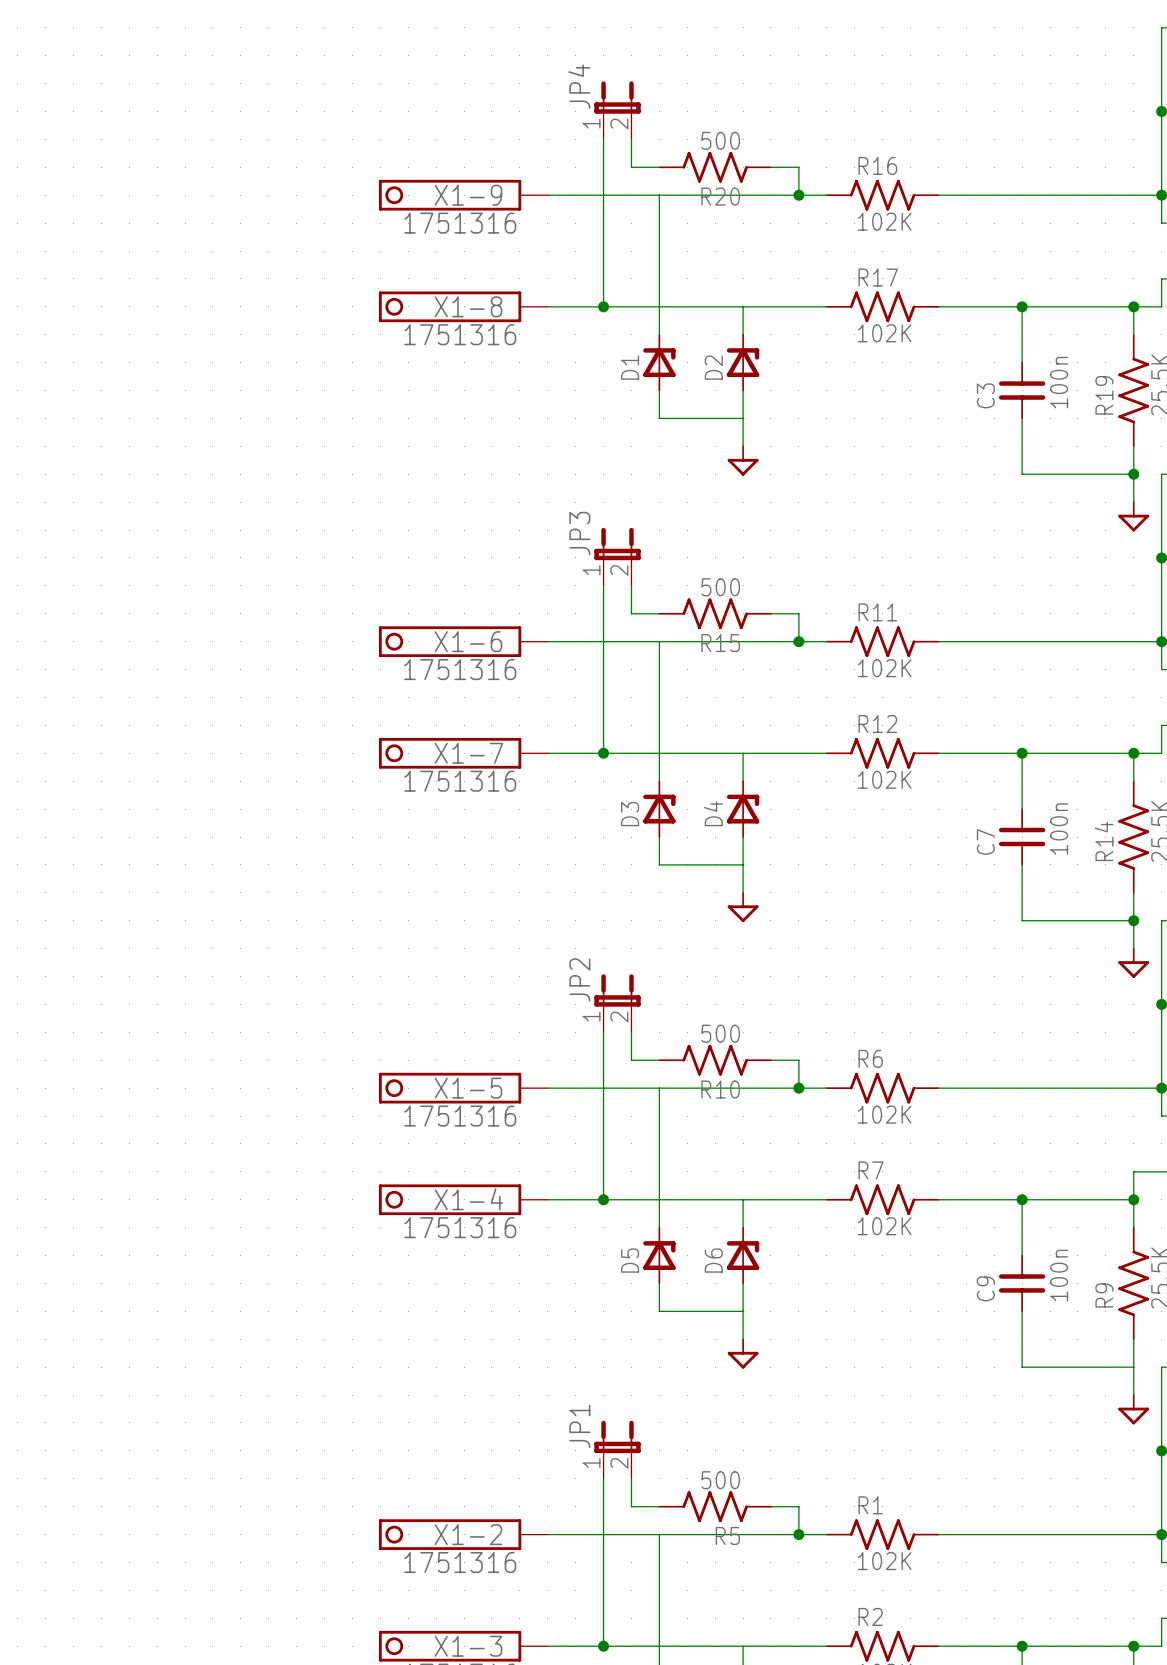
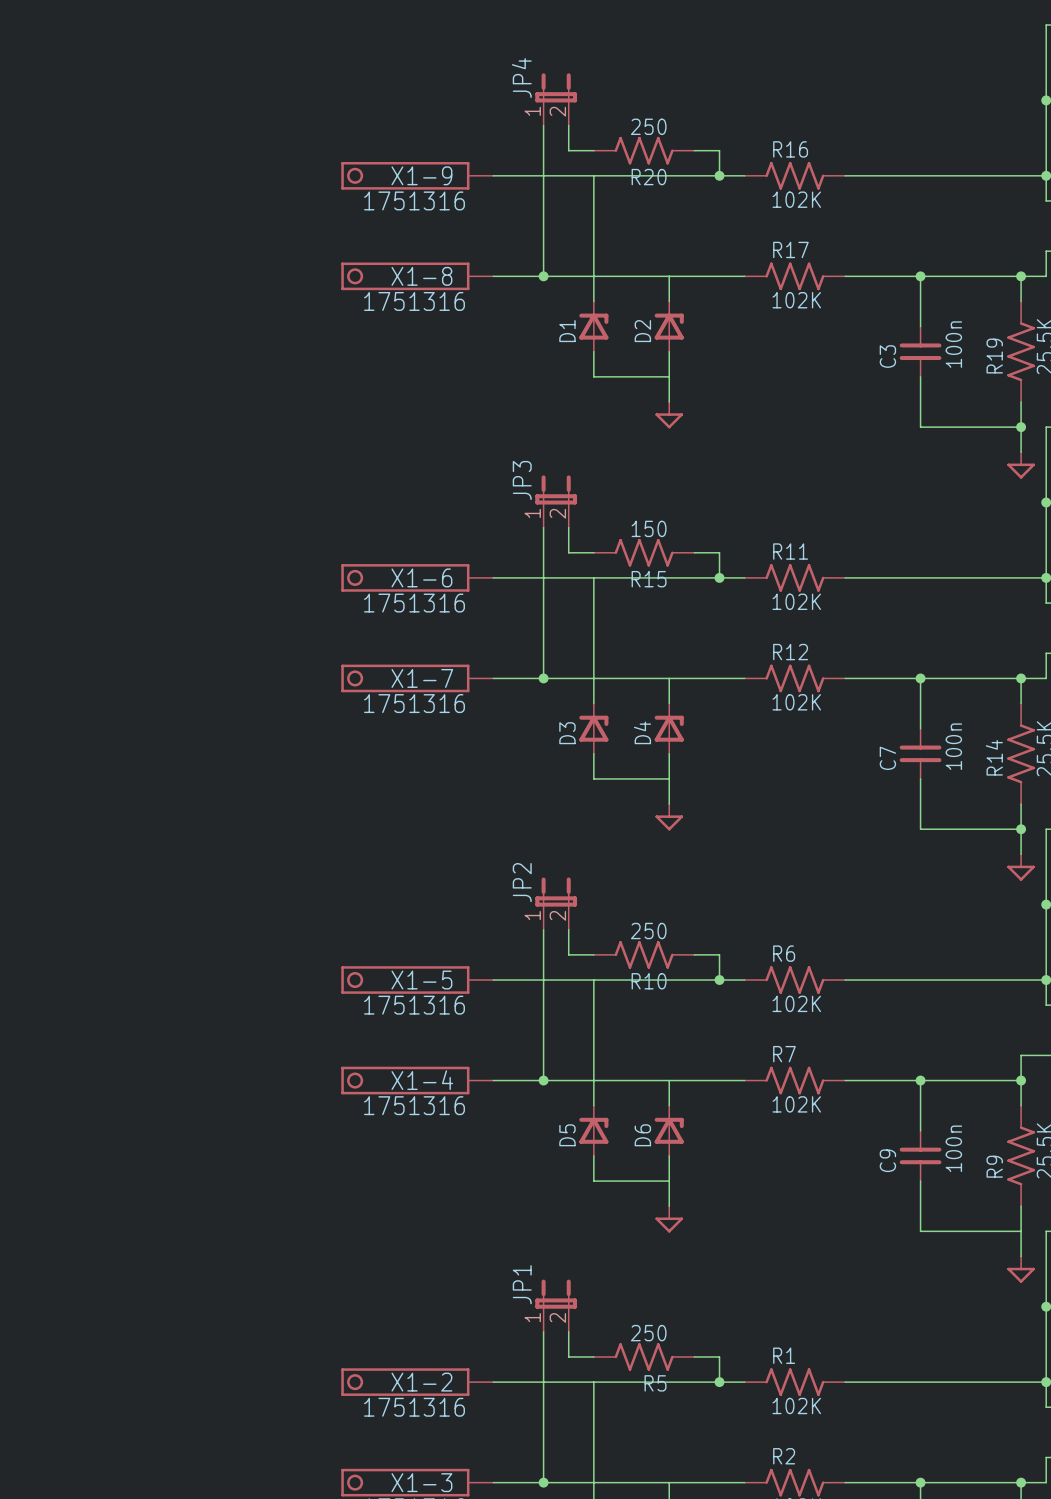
R20 value: 500 (720, 140) -> 250 (648, 126)
R15 value: 500 (720, 587) -> 150 (649, 528)
R10 value: 500 (720, 1033) -> 250 (648, 931)
R5 value: 500 (720, 1480) -> 250 (648, 1333)

